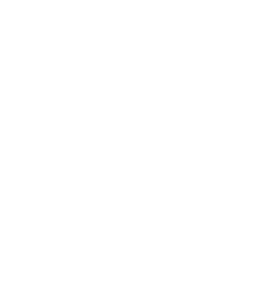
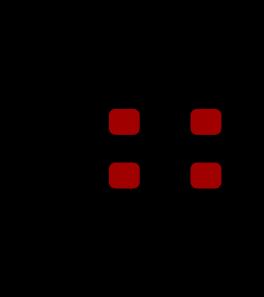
part: none -> (124, 148)
part: none -> (205, 148)

